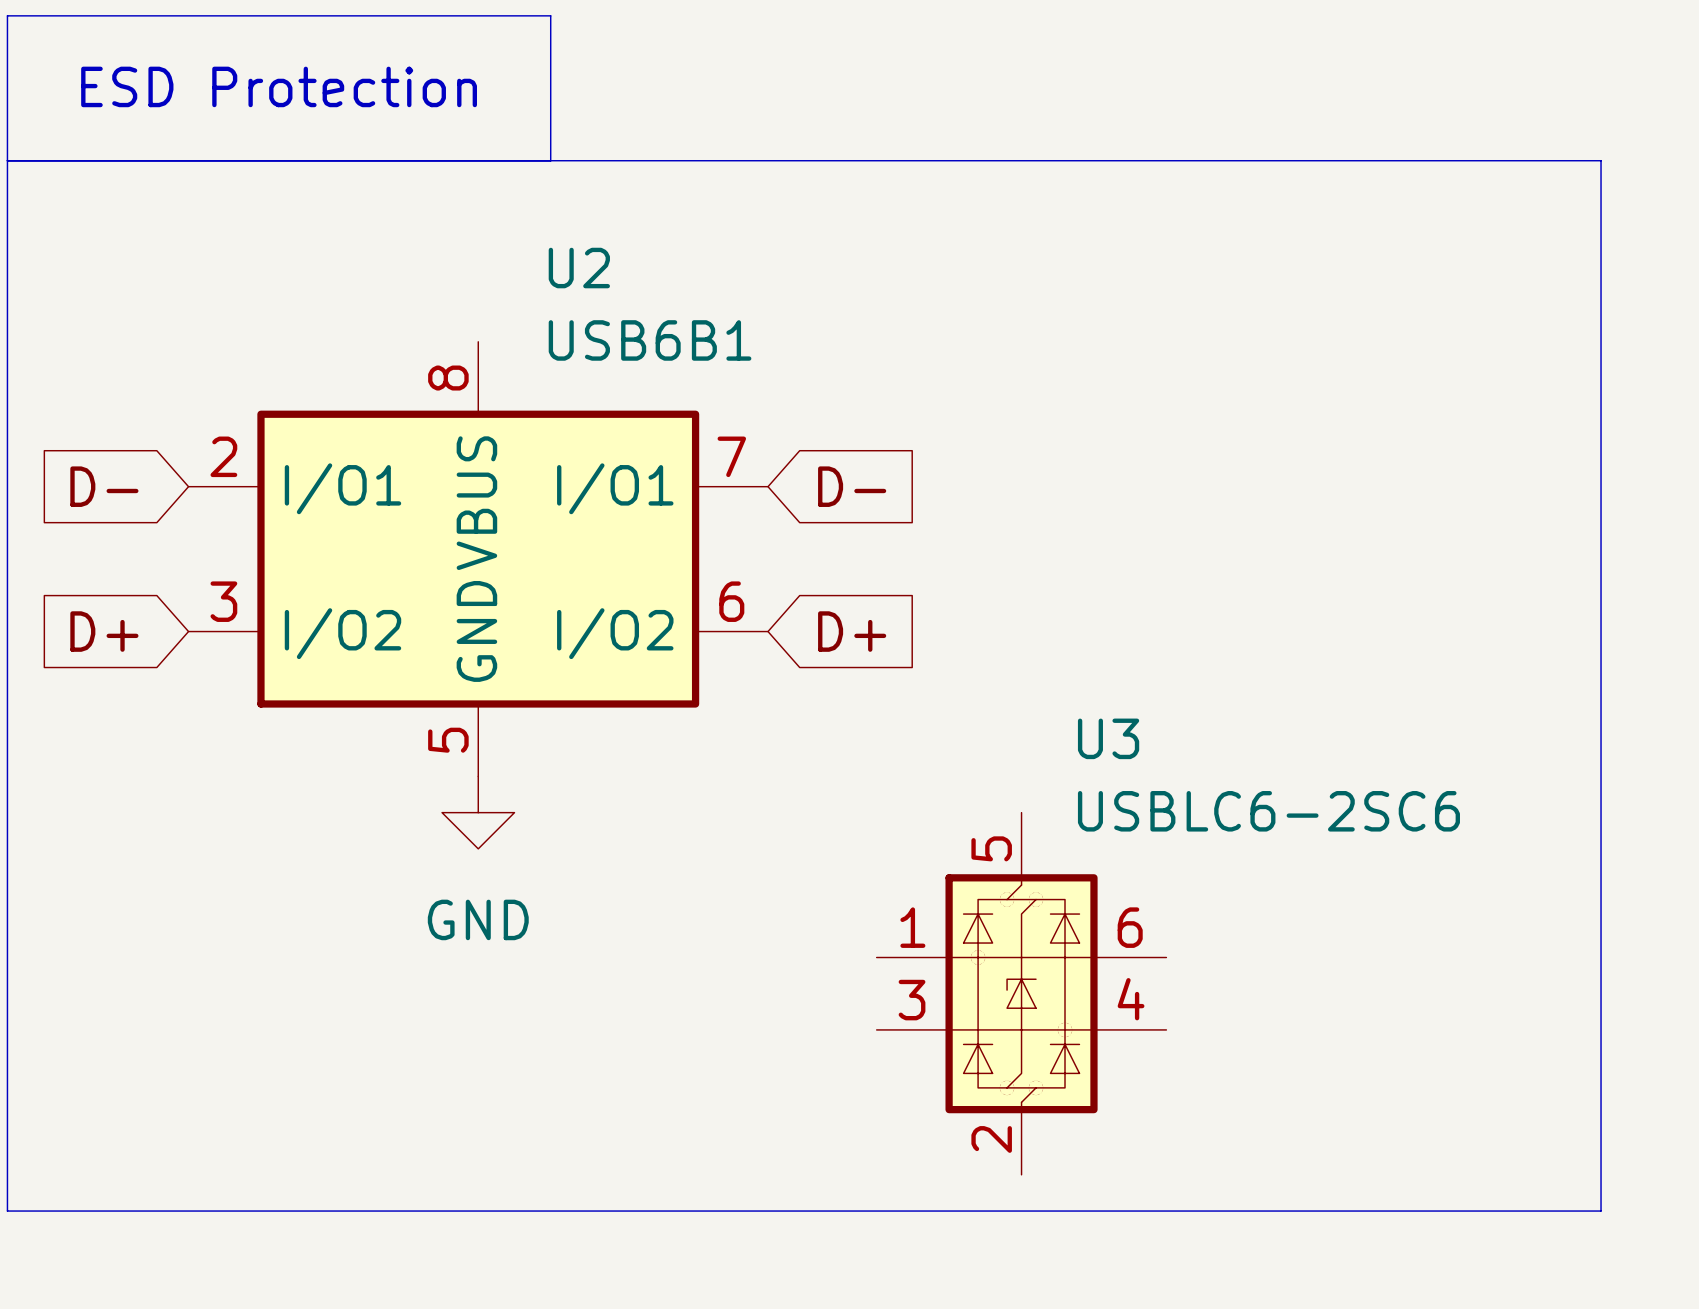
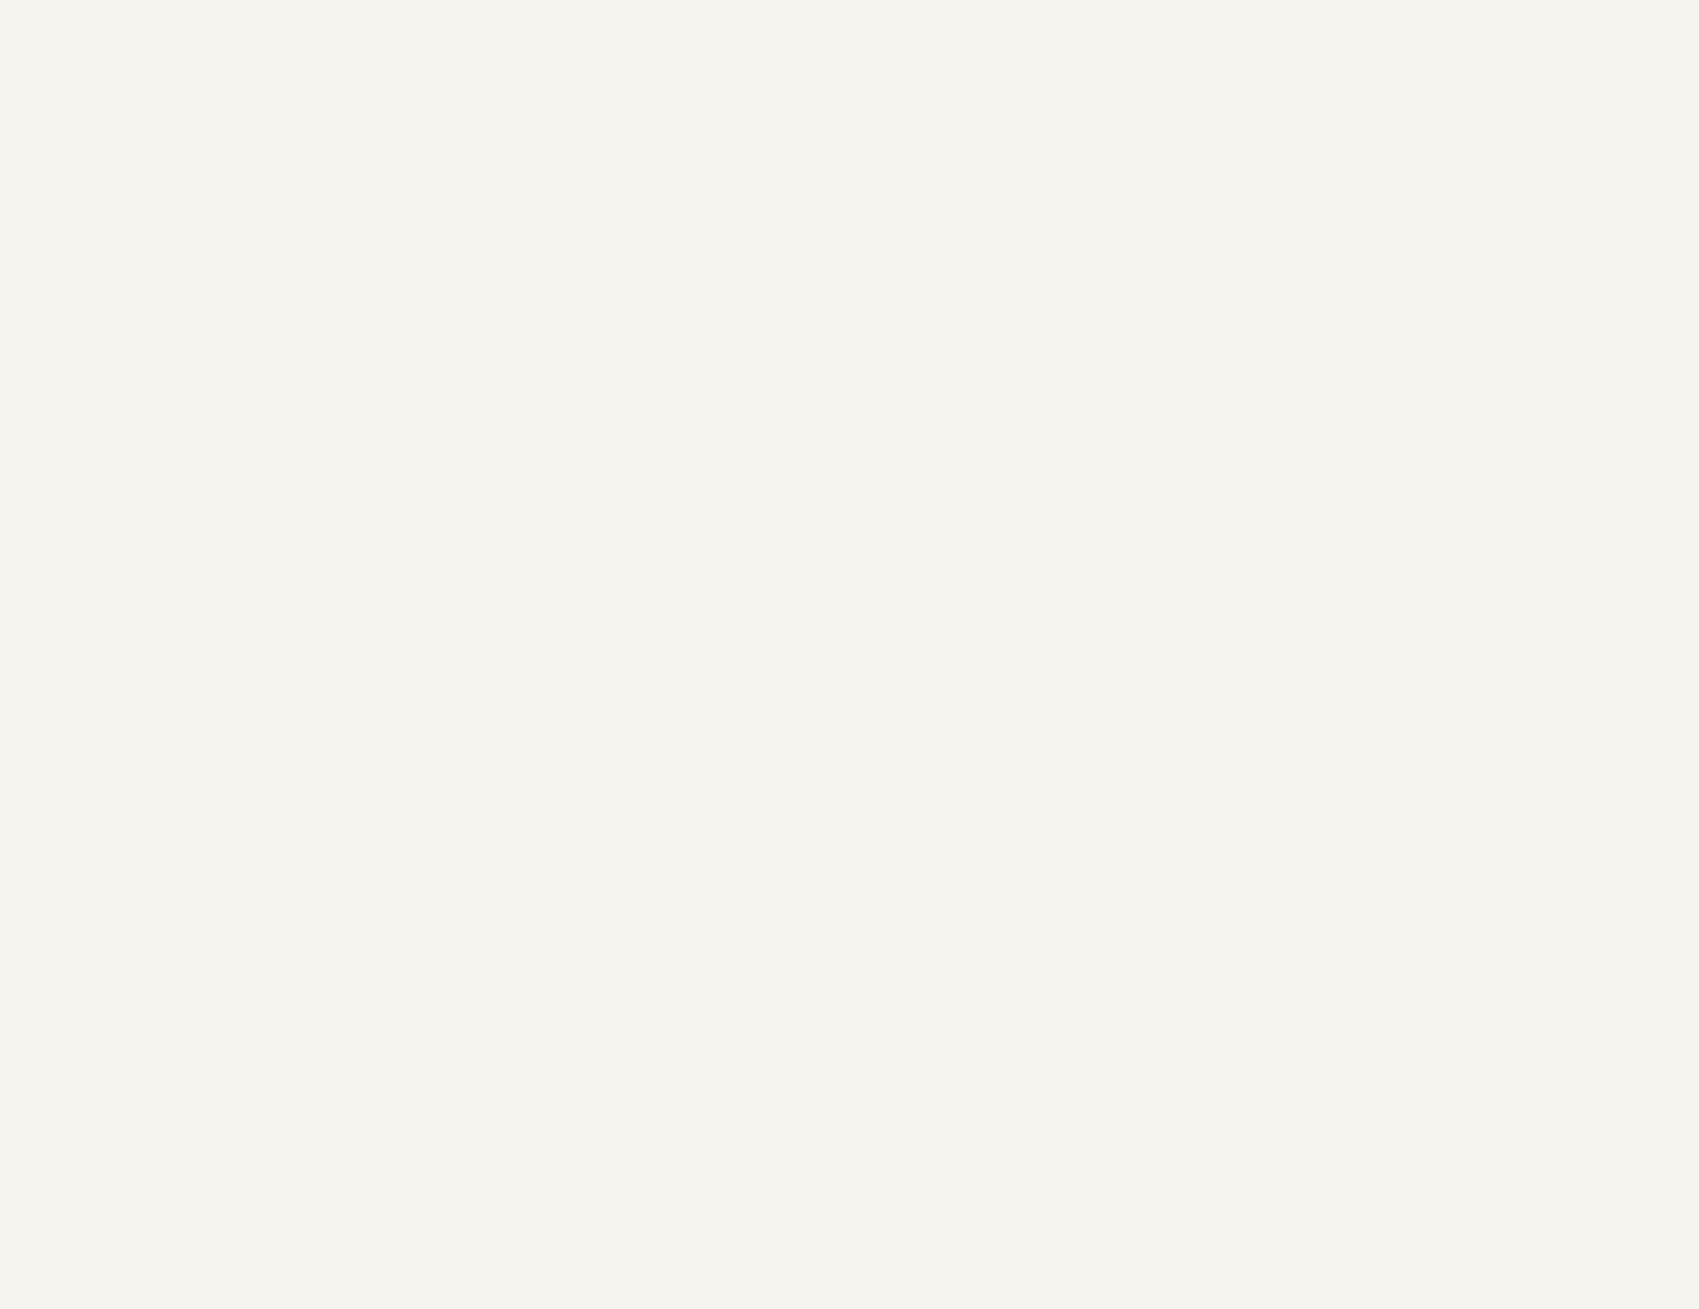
text: ESD Protection (279, 86) -> none
line: (7, 160) (1601, 160) (1601, 1211) (7, 1211) (7, 15) (550, 15) (550, 160) -> none
global label: D- (104, 486) -> none
global label: D- (852, 486) -> none
U2: USB6B1 (478, 559) -> none
global label: D+ (104, 631) -> none
global label: D+ (852, 631) -> none
power symbol: GND (478, 812) -> none
U3: USBLC6-2SC6 (1021, 993) -> none

